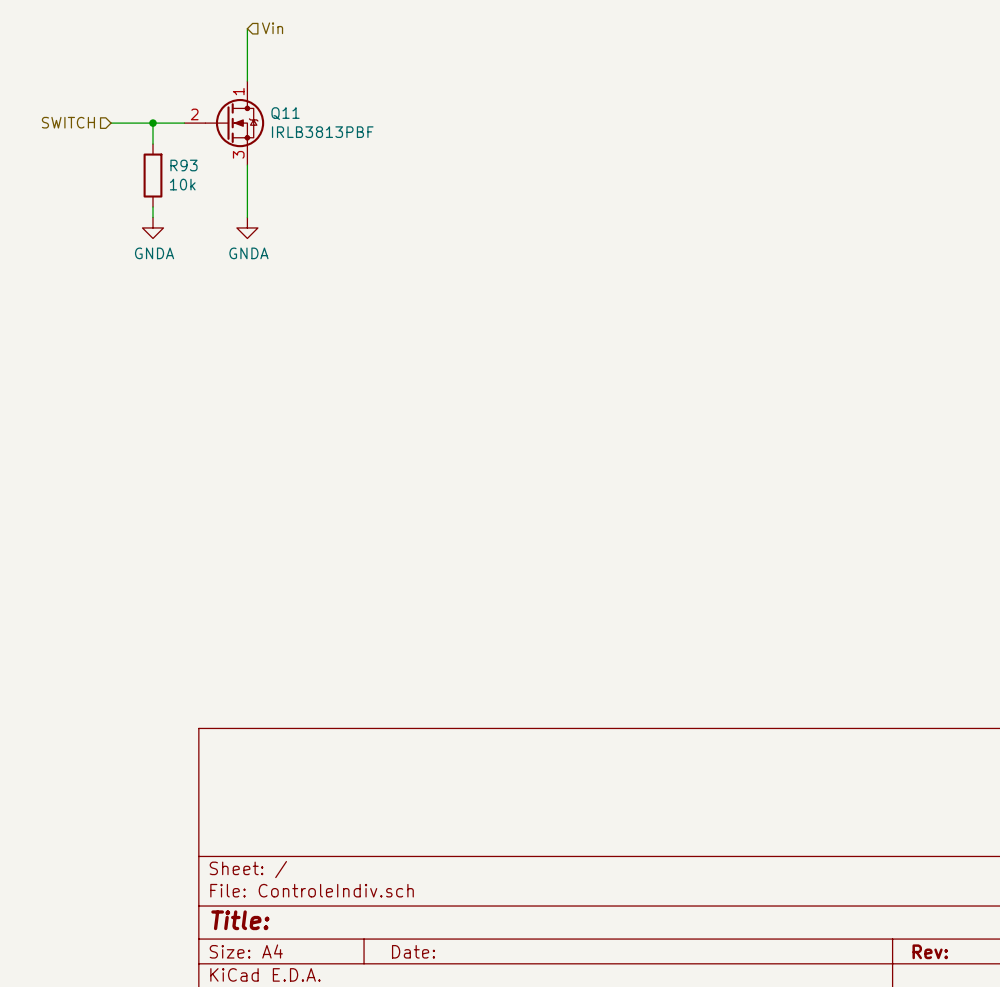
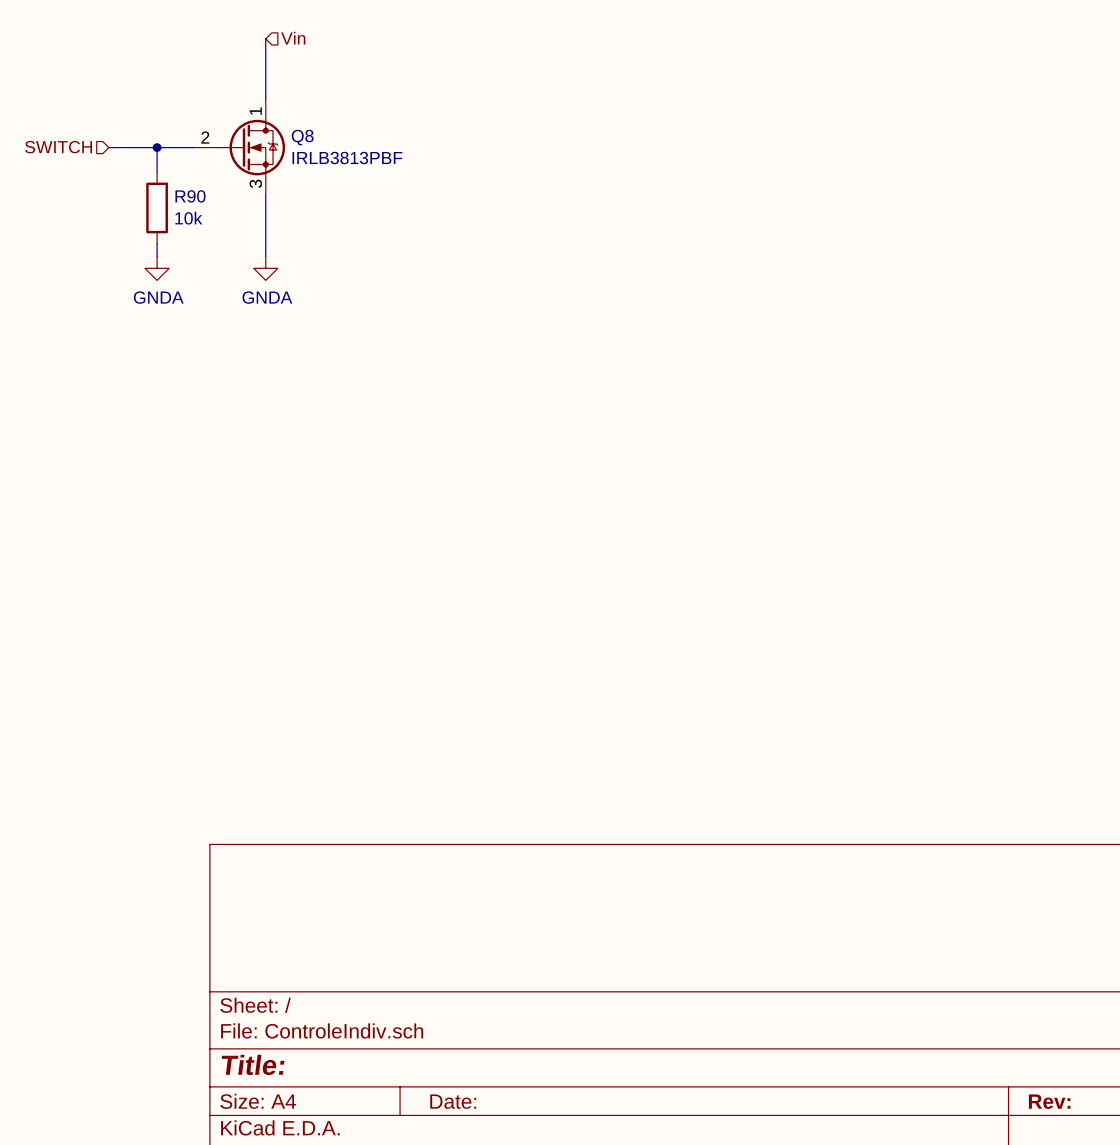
Q11 name: Q11 (285, 113) -> Q8 (302, 137)
R93 name: R93 (183, 165) -> R90 (190, 196)

